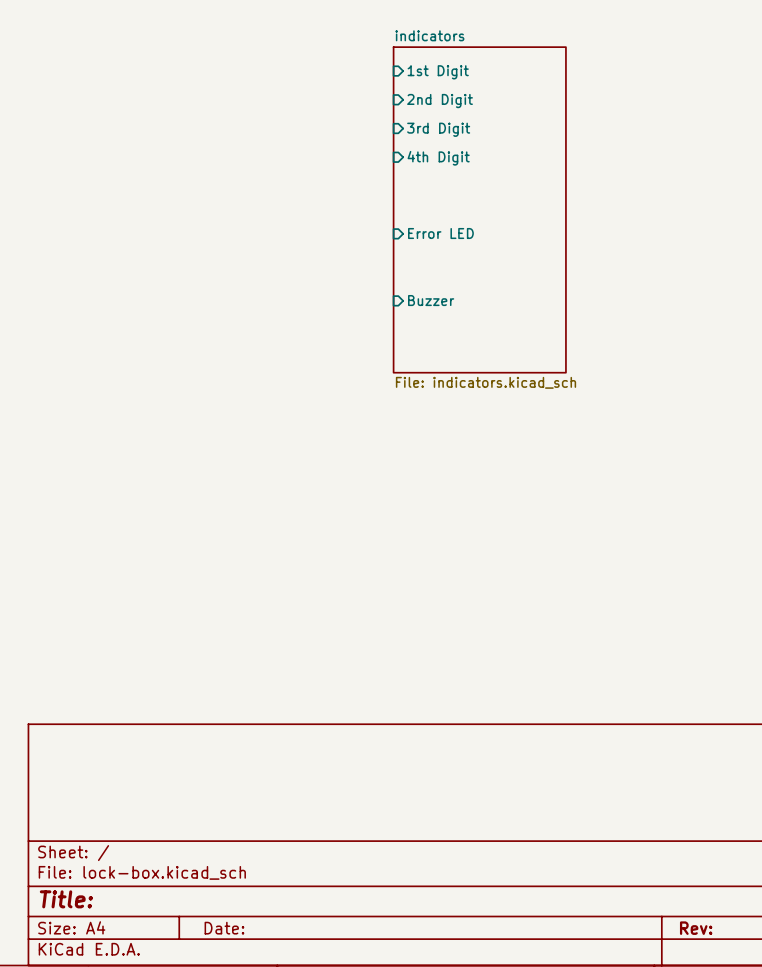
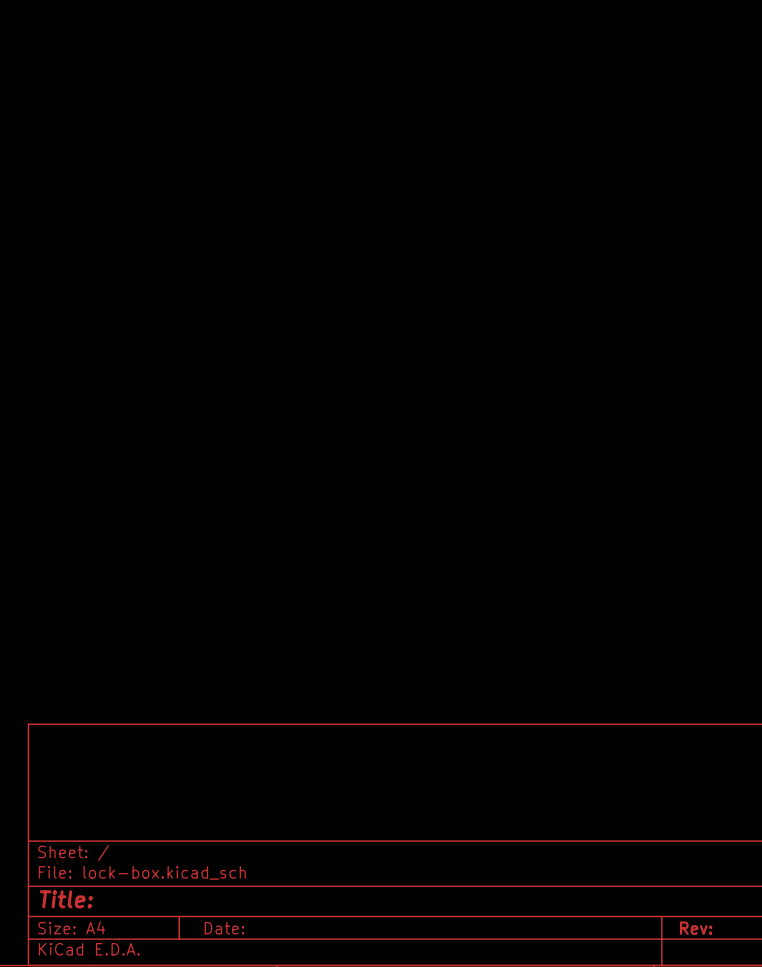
sheet pin: 1st Digit (438, 72) -> none
sheet pin: 2nd Digit (440, 101) -> none
sheet pin: 3rd Digit (438, 129) -> none
sheet pin: 4th Digit (438, 158) -> none
sheet indicators: File: indicators.kicad_sch (479, 209) -> none
sheet pin: Error LED (440, 233) -> none
sheet pin: Buzzer (431, 300) -> none

